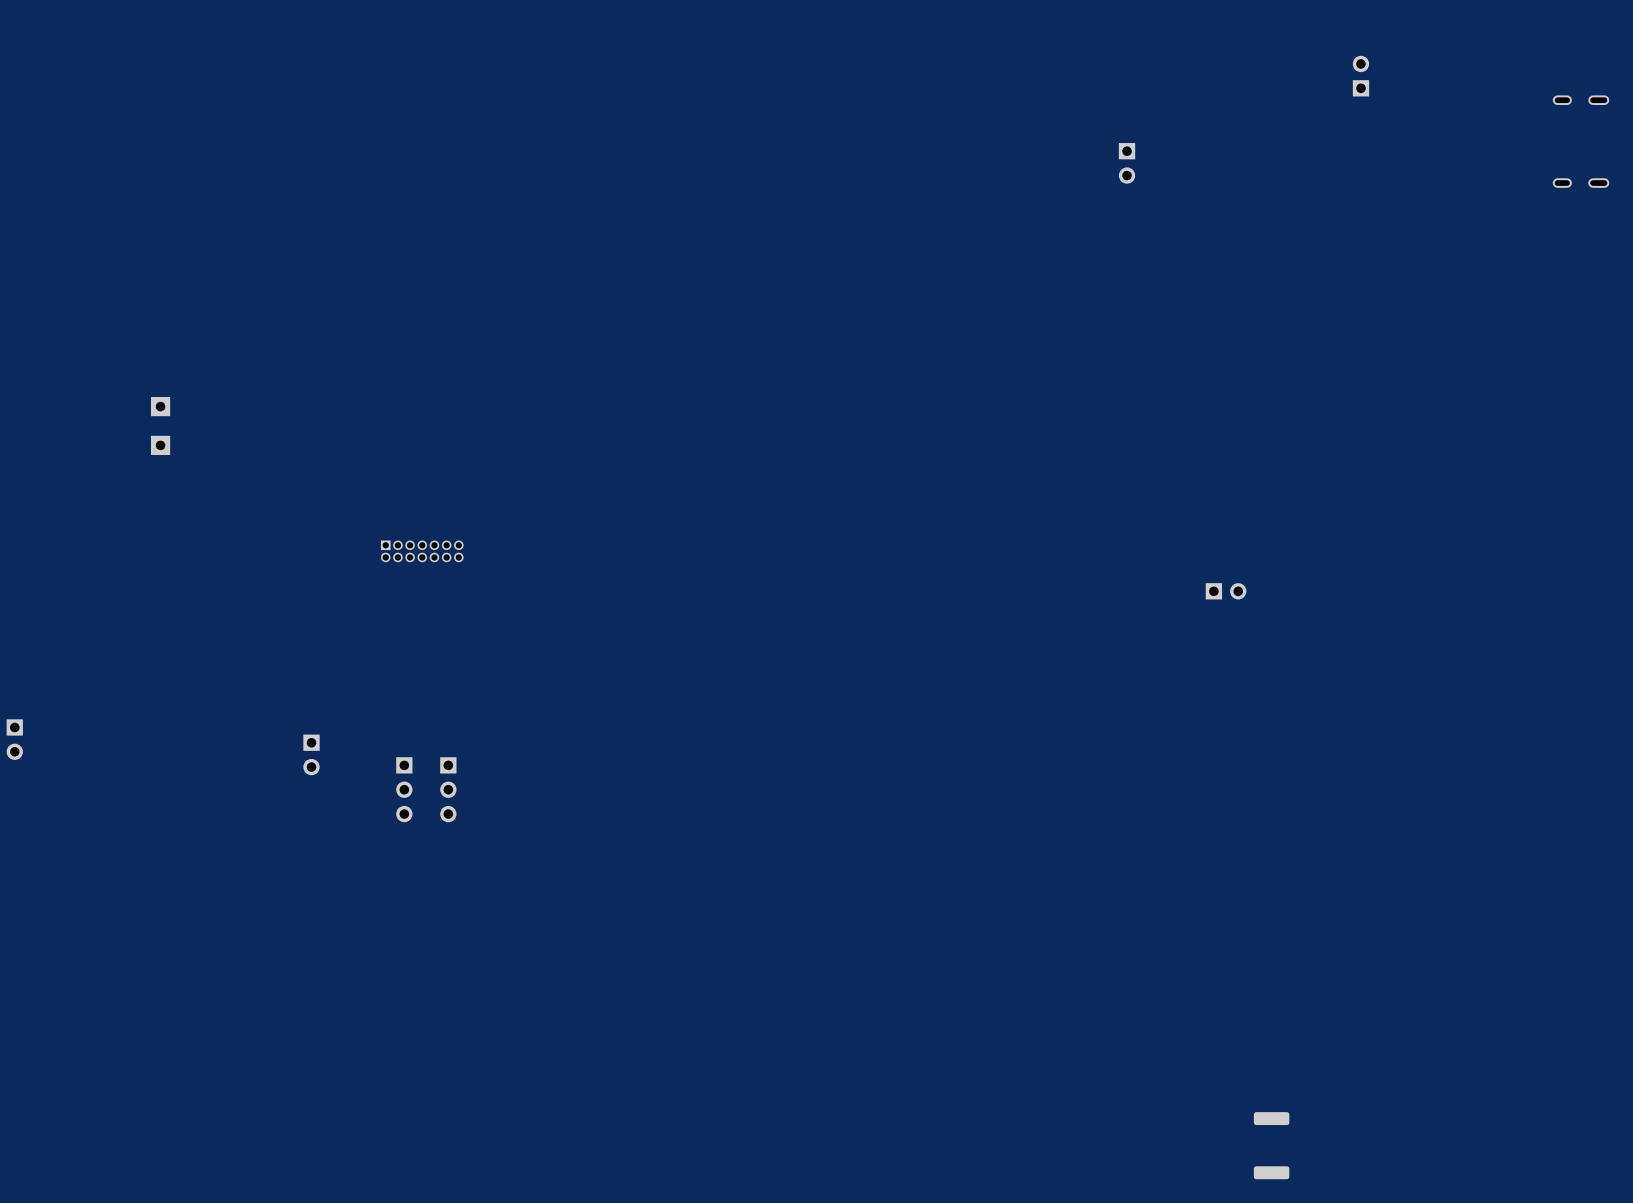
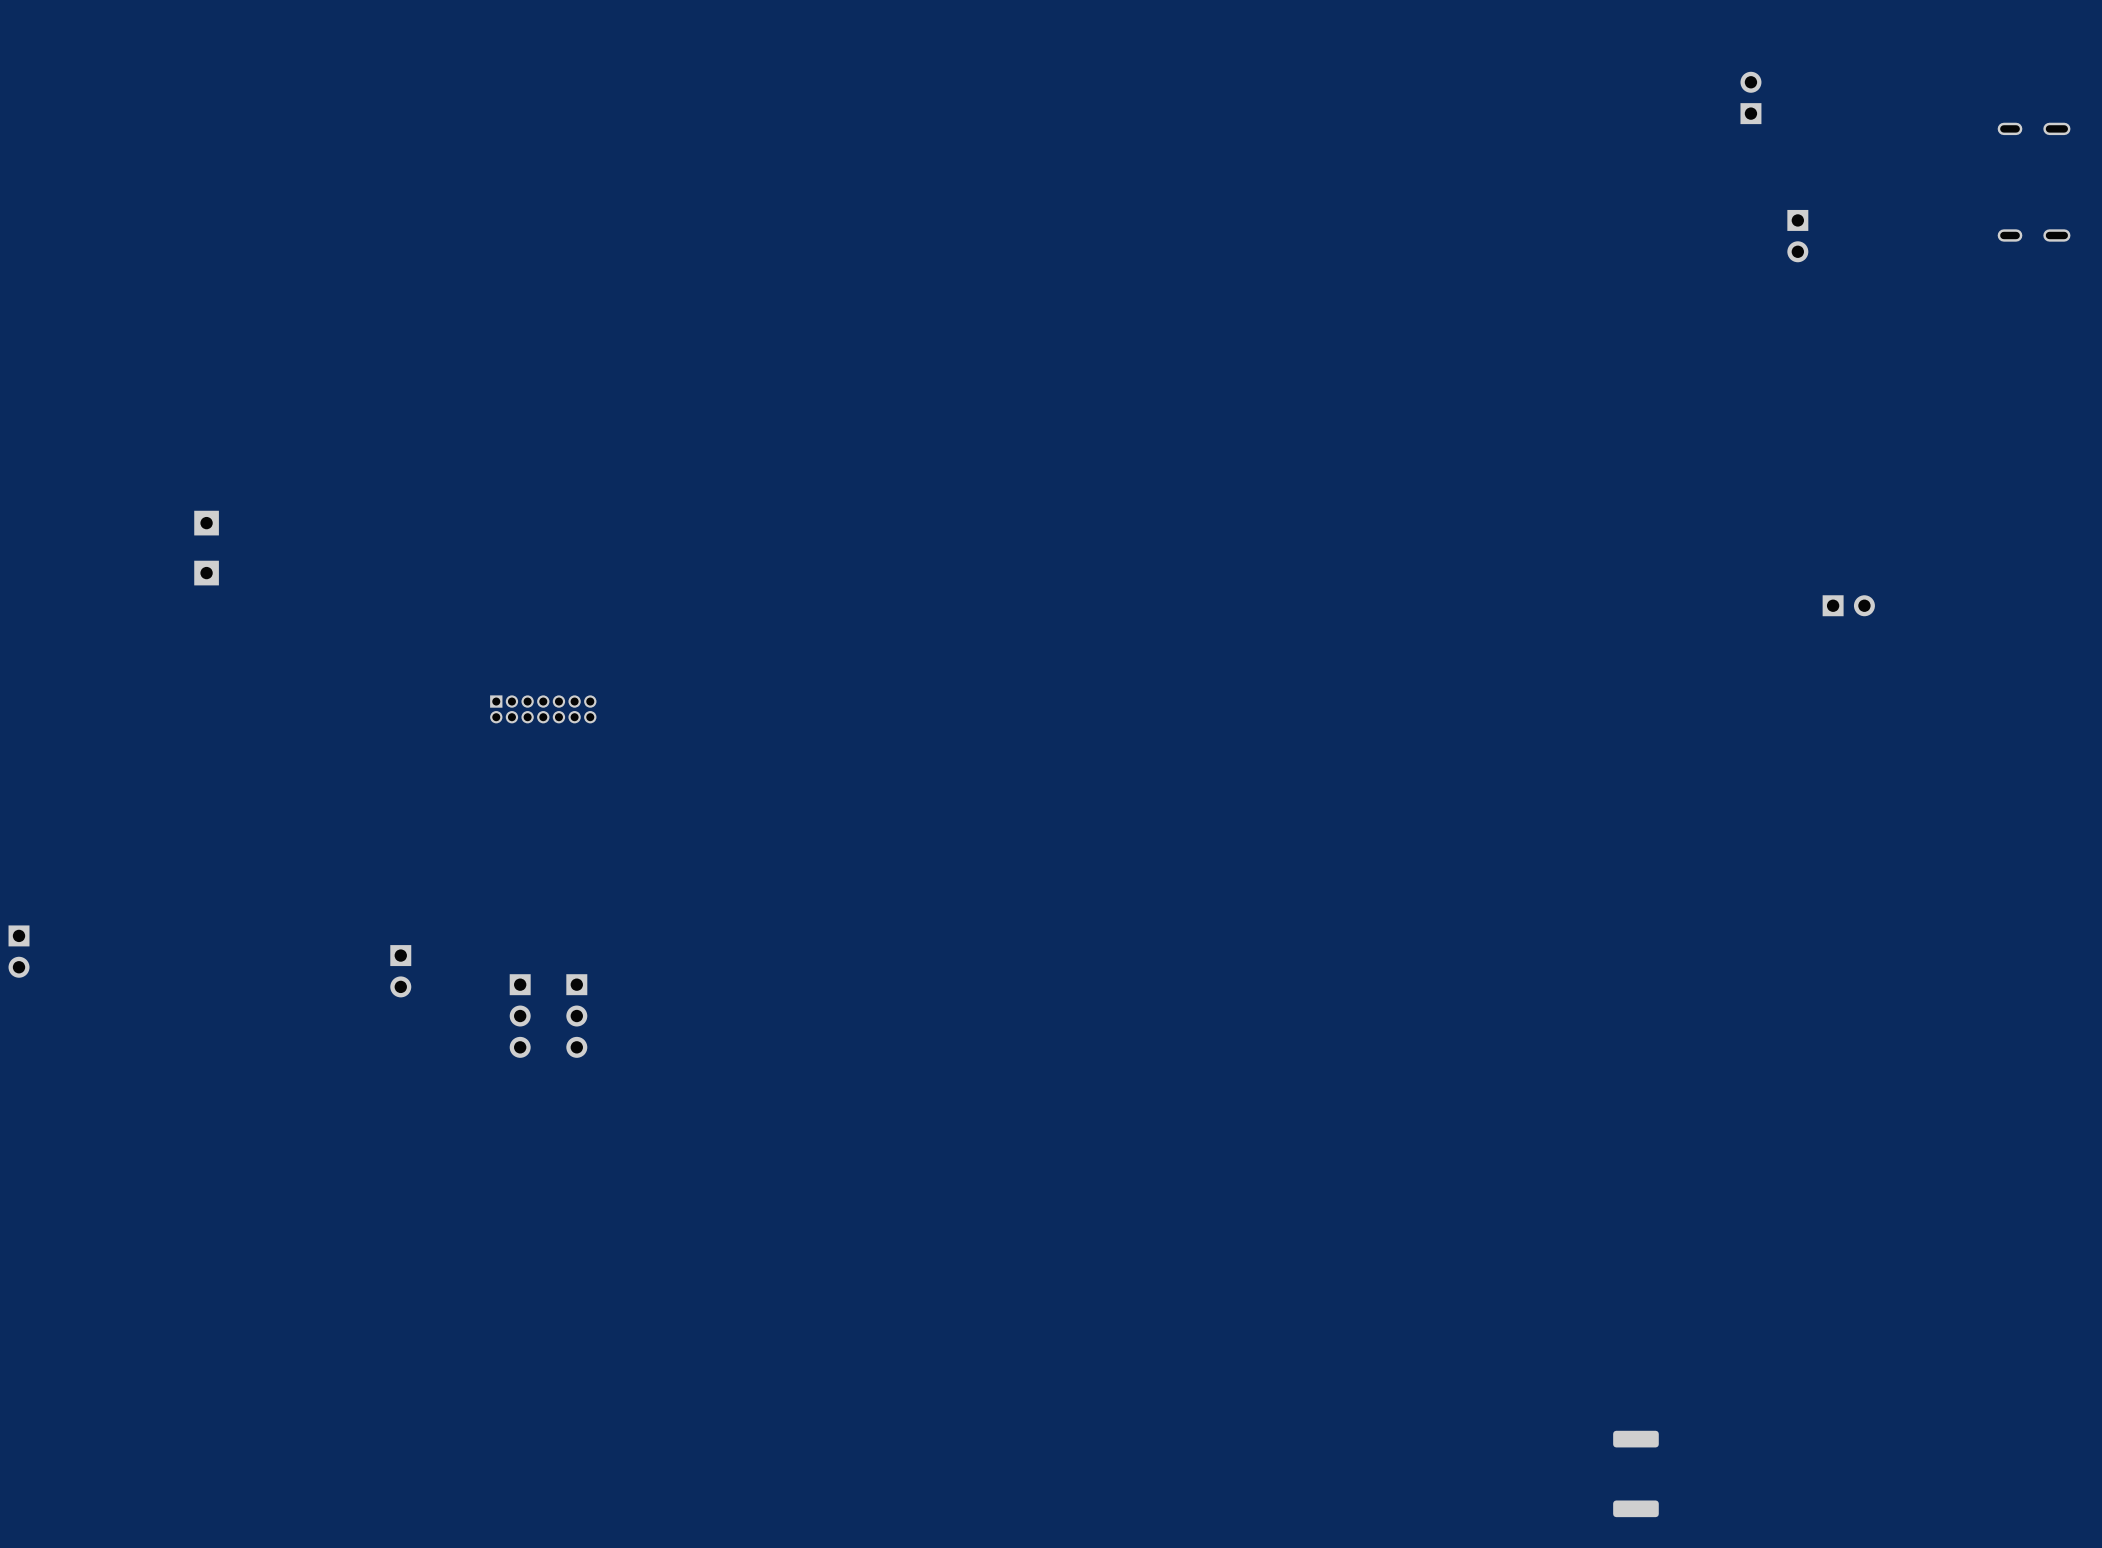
part: (1127, 163) -> none
part: none -> (1797, 236)
part: none -> (1848, 605)
part: (1226, 591) -> none

